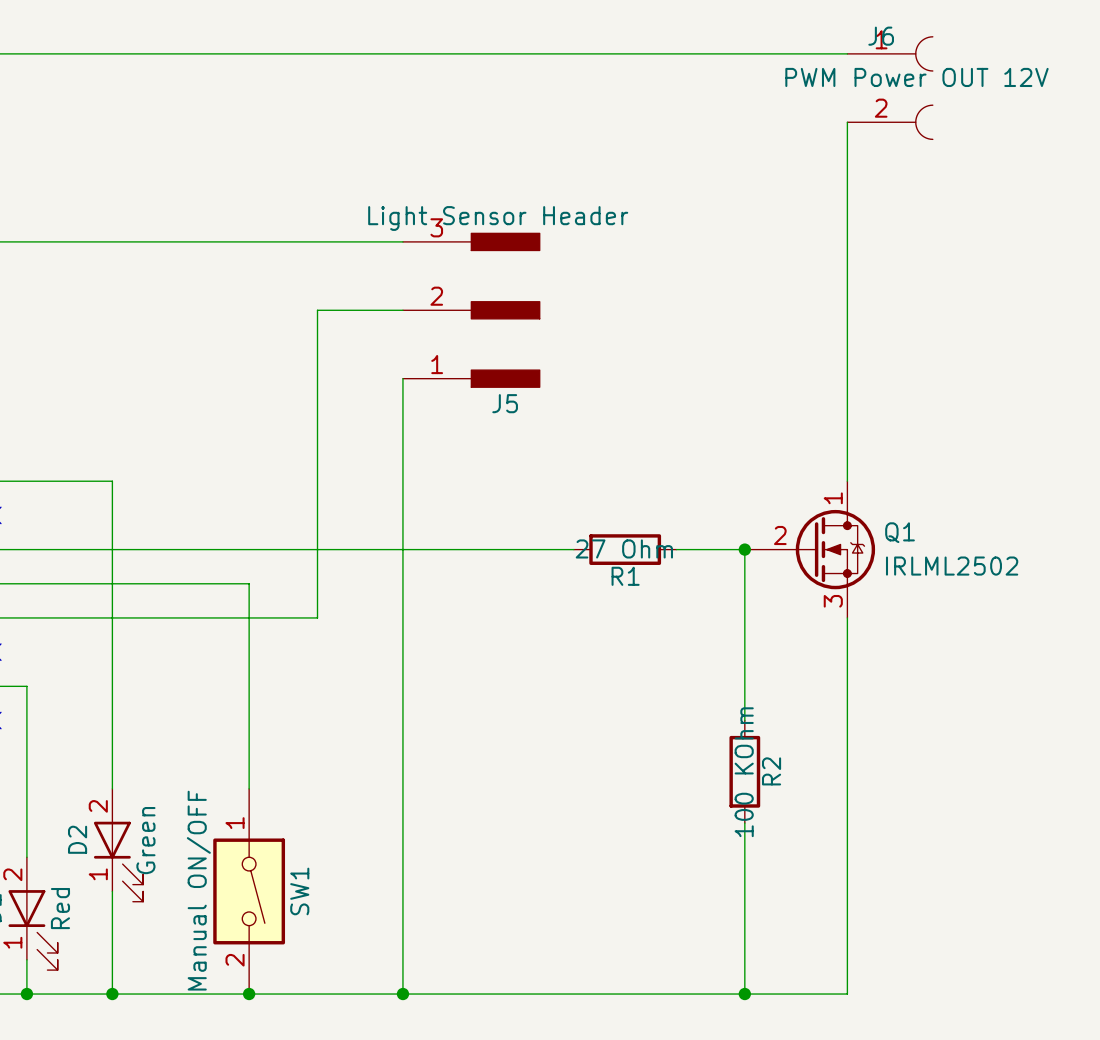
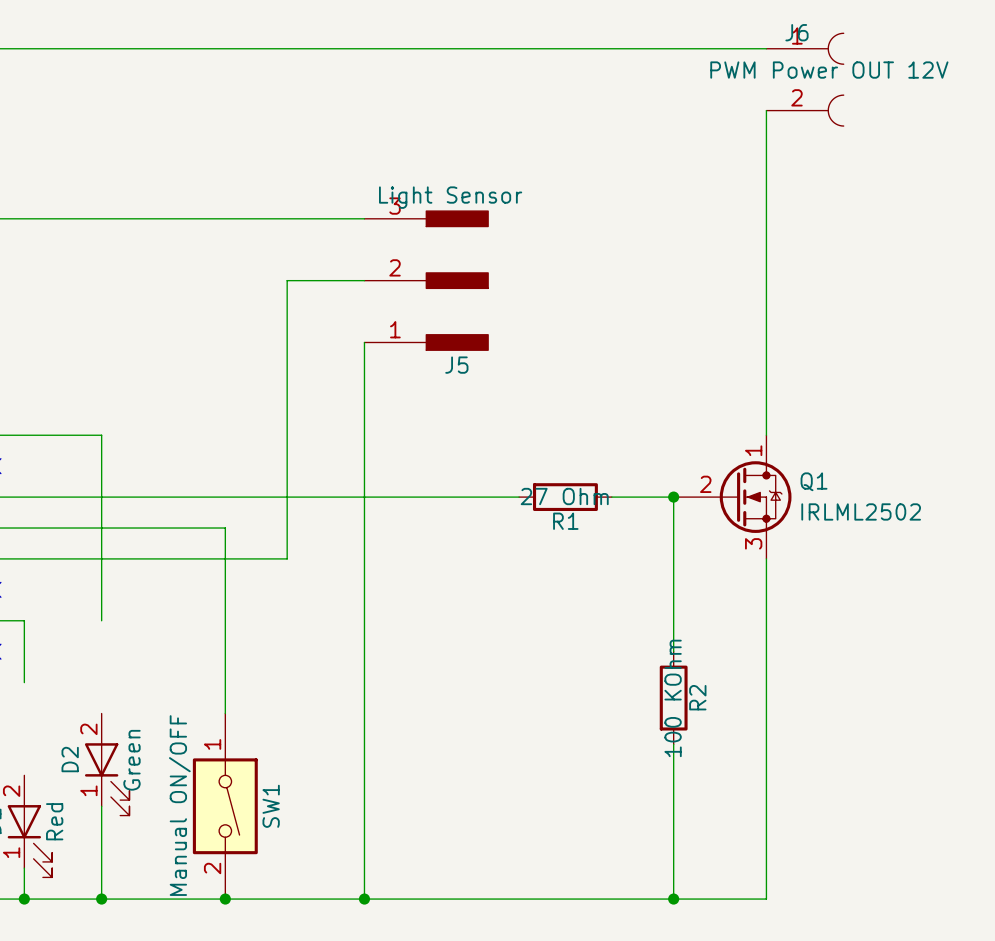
J5 value: Light Sensor Header (498, 218) -> Light Sensor (450, 197)
wire: (112, 686) (112, 788) -> none
wire: (26, 754) (26, 857) -> none

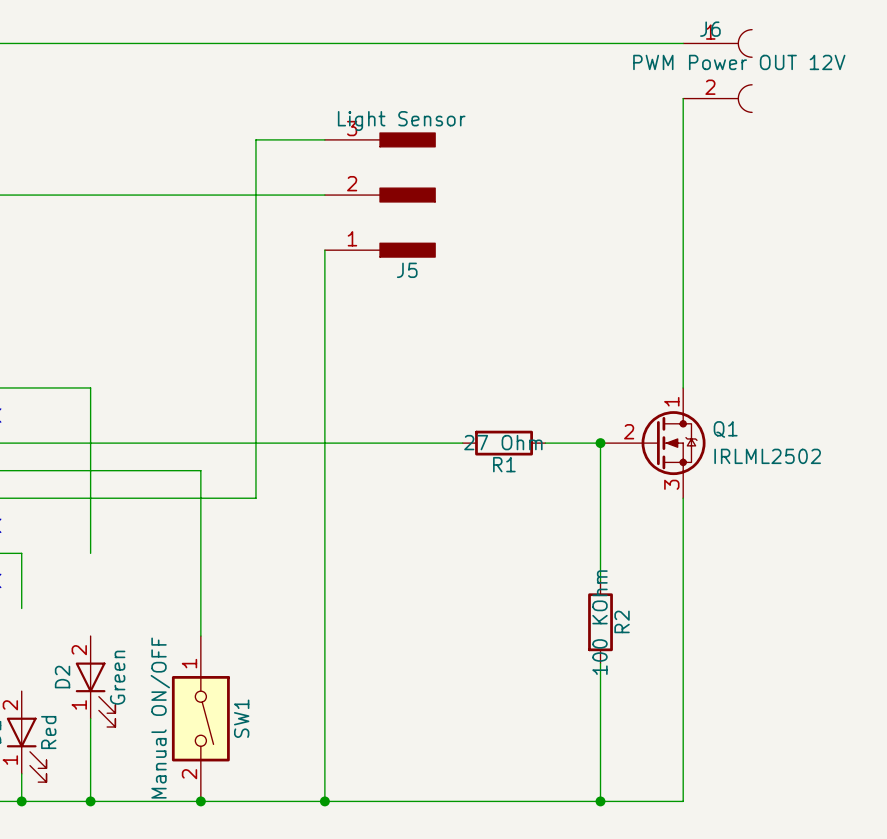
wire: none -> (324, 139) (255, 139) (255, 250)
wire: (287, 280) (364, 280) -> (324, 305) (324, 250)
J5 position: (426, 280) -> (380, 195)

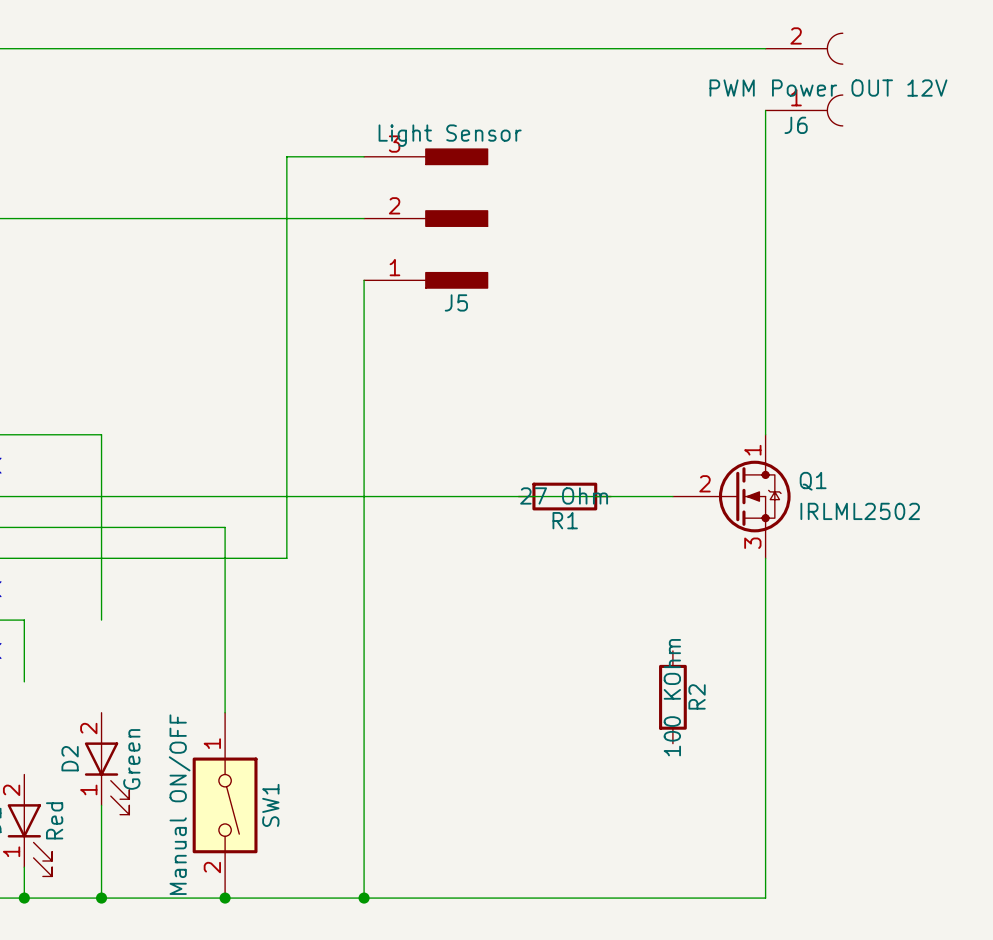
J6 flip: as is (745, 71) -> up-down (835, 79)
wire: none -> (518, 496) (611, 496)
wire: (600, 443) (600, 580) -> none
junction: (600, 443) -> none
wire: (600, 663) (600, 801) -> none
junction: (600, 801) -> none

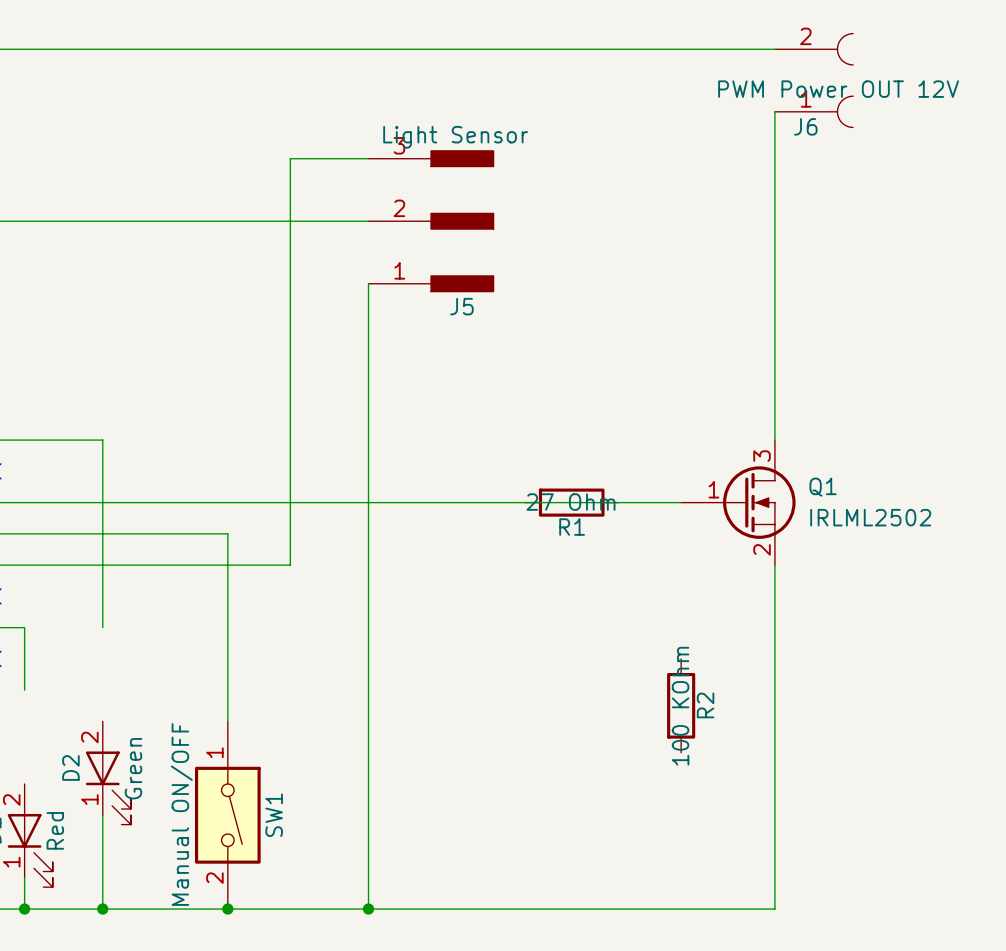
Q1 symbol: [672, 434, 791, 559] -> [681, 440, 796, 566]

